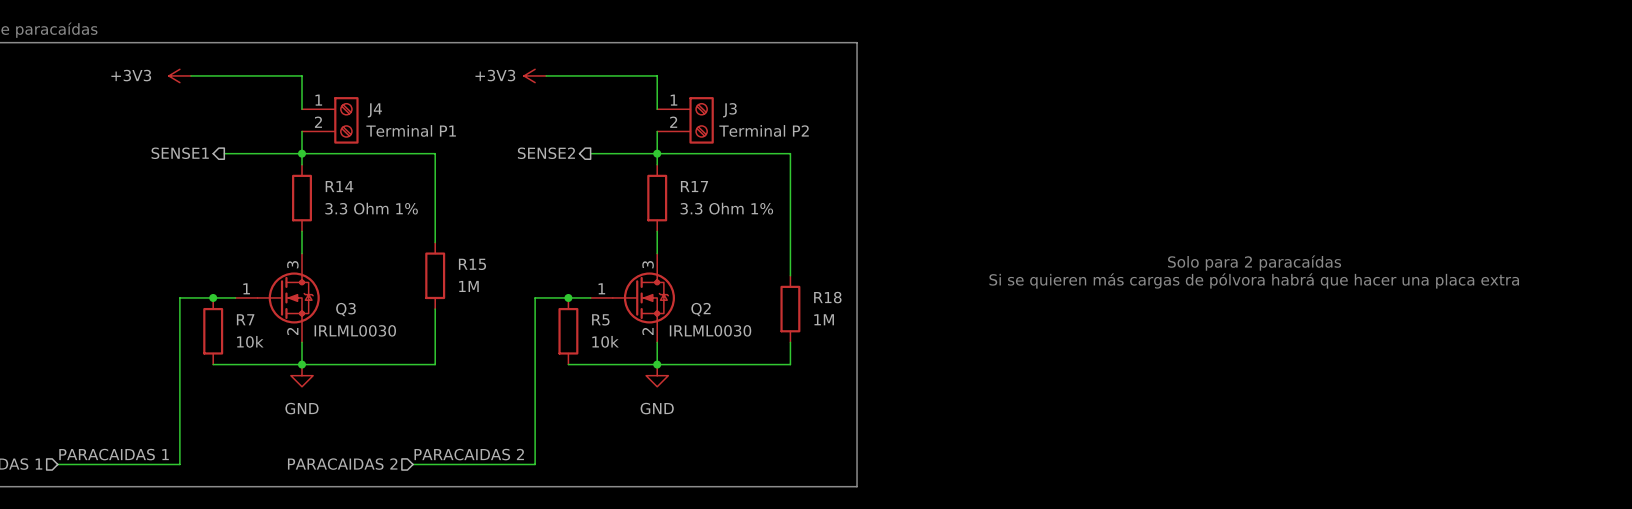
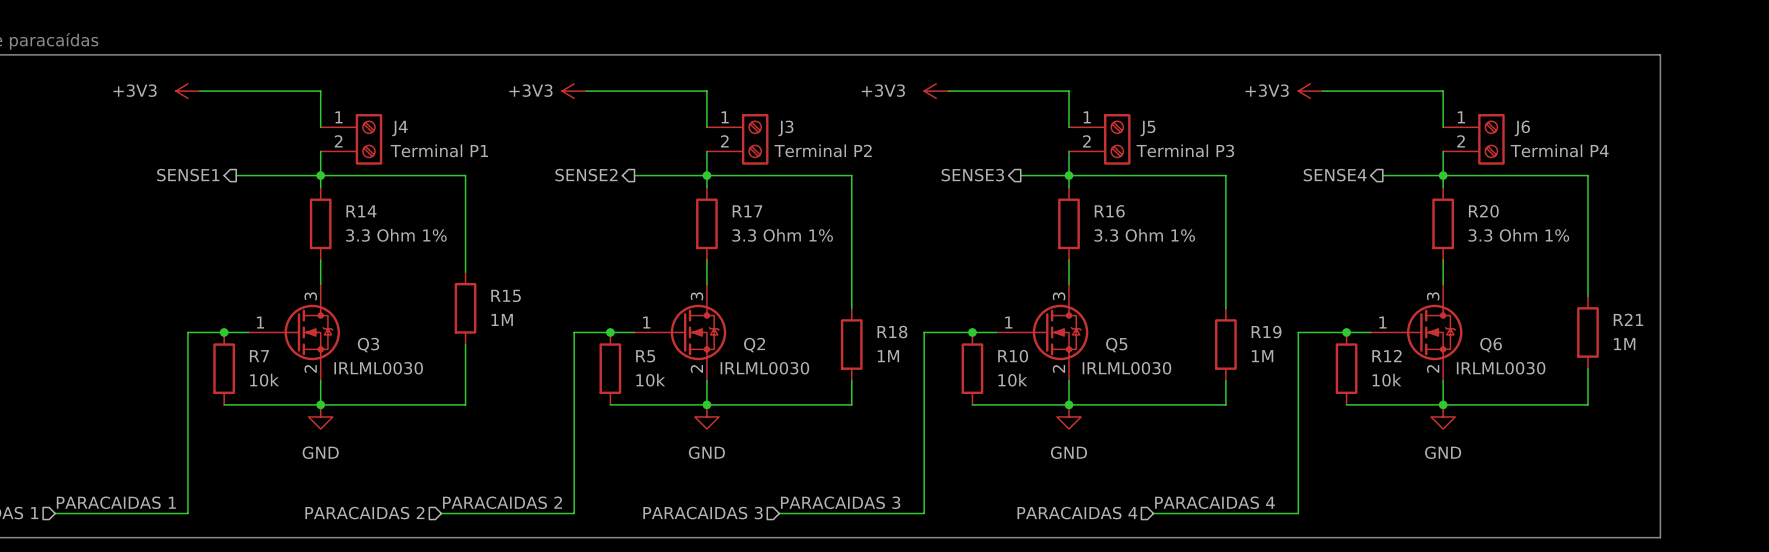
line: (857, 42) (857, 486) -> (924, 54) (1660, 54) (1660, 537) (924, 537)
power symbol: none -> +3V3 (936, 91)
wire: none -> (948, 91) (1069, 91) (1069, 127)
power symbol: none -> +3V3 (1310, 91)
wire: none -> (1322, 91) (1443, 91) (1443, 127)
J5: none -> Terminal P3 (1099, 139)
J6: none -> Terminal P4 (1473, 139)
wire: none -> (1069, 151) (1069, 187)
wire: none -> (1443, 151) (1443, 187)
hierarchical label: none -> SENSE3 (972, 175)
wire: none -> (1020, 175) (1225, 175) (1225, 308)
junction: none -> (1069, 175)
hierarchical label: none -> SENSE4 (1335, 175)
wire: none -> (1382, 175) (1587, 175) (1587, 296)
junction: none -> (1443, 175)
R16: none -> 3.3 Ohm 1% (1069, 223)
R20: none -> 3.3 Ohm 1% (1443, 223)
wire: none -> (1069, 260) (1069, 284)
wire: none -> (1443, 260) (1443, 284)
text: Solo para 2 paracaídas (1254, 263) -> none
text: Si se quieren más cargas de pólvora habrá que hacer una placa extra (1254, 280) -> none
junction: none -> (972, 332)
wire: none -> (996, 332) (924, 332) (924, 513) (779, 513)
Q5: none -> IRLML0030 (1042, 332)
junction: none -> (1346, 332)
wire: none -> (1370, 332) (1298, 332) (1298, 513) (1153, 513)
Q6: none -> IRLML0030 (1416, 332)
R21: none -> 1M (1587, 332)
R19: none -> 1M (1225, 344)
R10: none -> 10k (972, 368)
R12: none -> 10k (1346, 368)
wire: none -> (1587, 368) (1587, 404) (1346, 404)
wire: none -> (1069, 380) (1069, 404)
wire: none -> (1225, 380) (1225, 404) (972, 404)
wire: none -> (1443, 380) (1443, 404)
junction: none -> (1069, 404)
junction: none -> (1443, 404)
power symbol: none -> GND (1069, 416)
power symbol: none -> GND (1443, 416)
label: none -> PARACAIDAS 3 (840, 502)
label: none -> PARACAIDAS 4 (1214, 502)
hierarchical label: none -> PARACAIDAS 3 (703, 513)
hierarchical label: none -> PARACAIDAS 4 (1077, 513)

